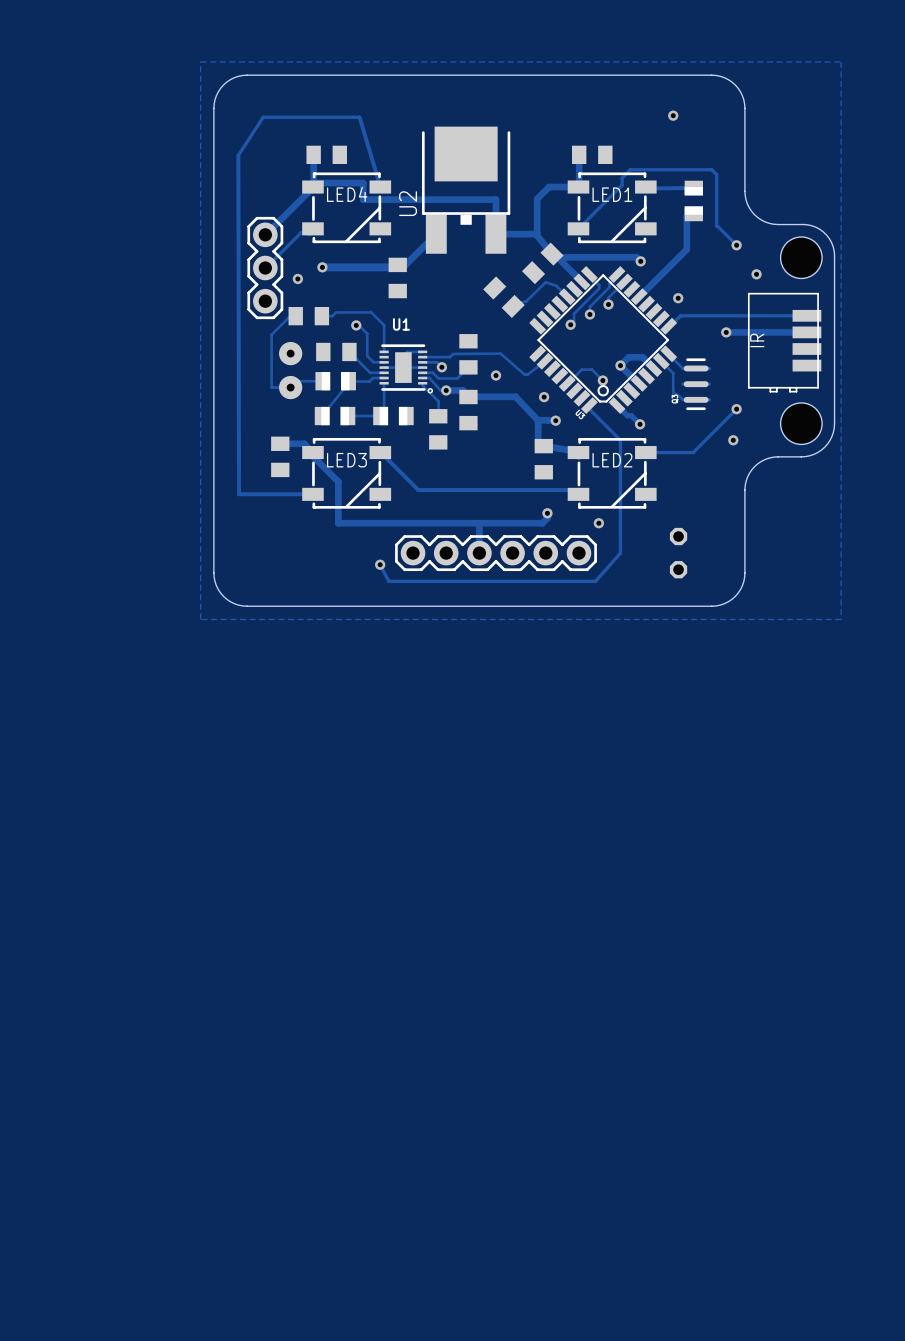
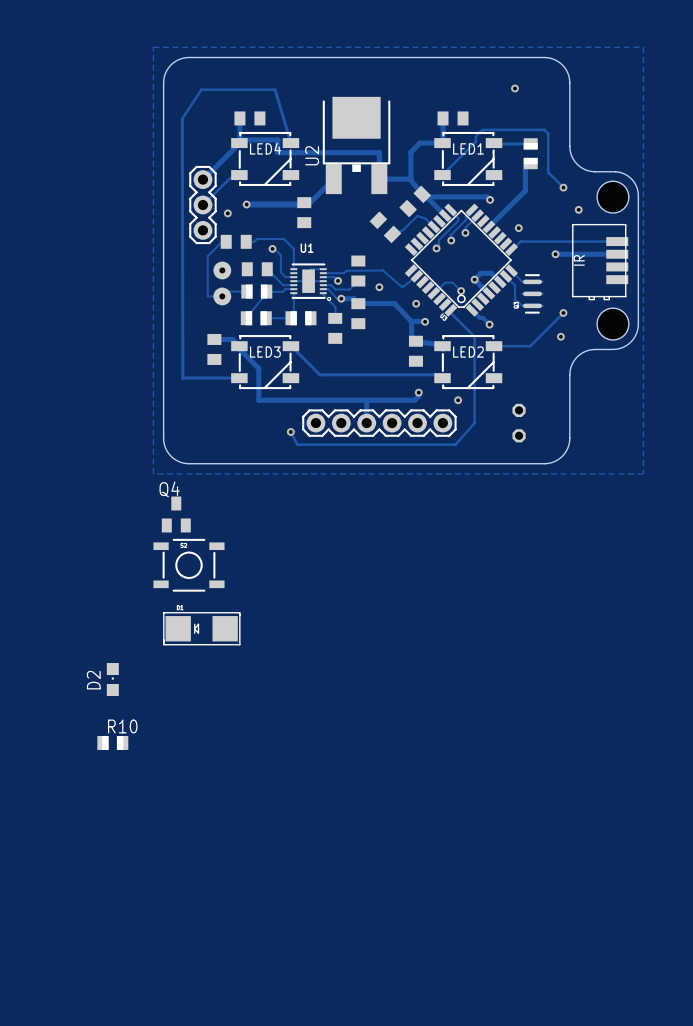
Q4: none -> (176, 514)
part: none -> (189, 565)
part: none -> (201, 628)
D2: none -> (112, 679)
R10: none -> (112, 742)

